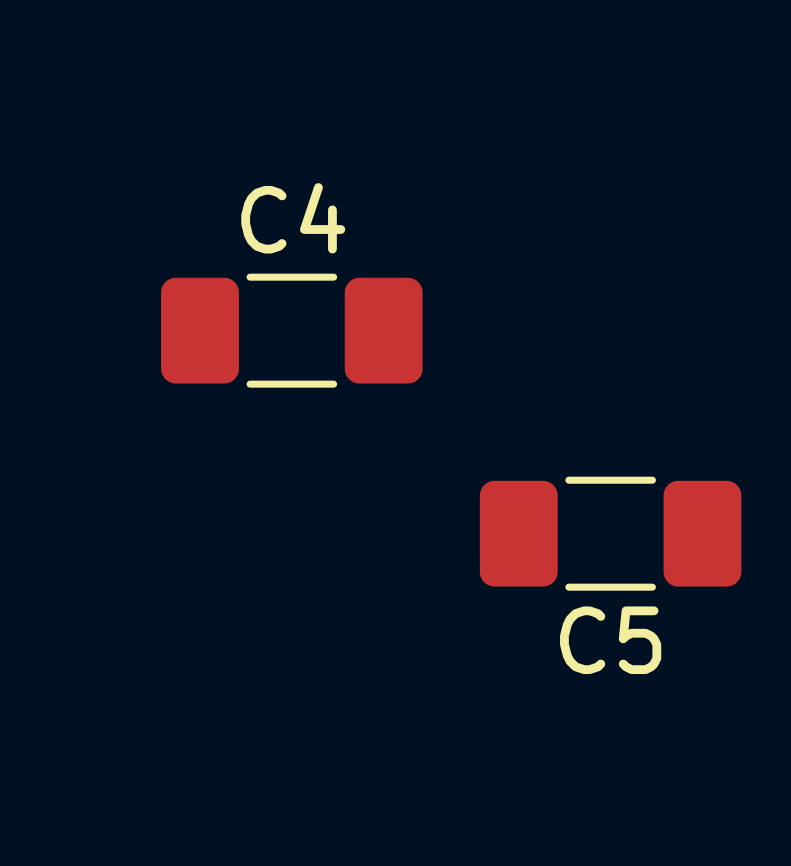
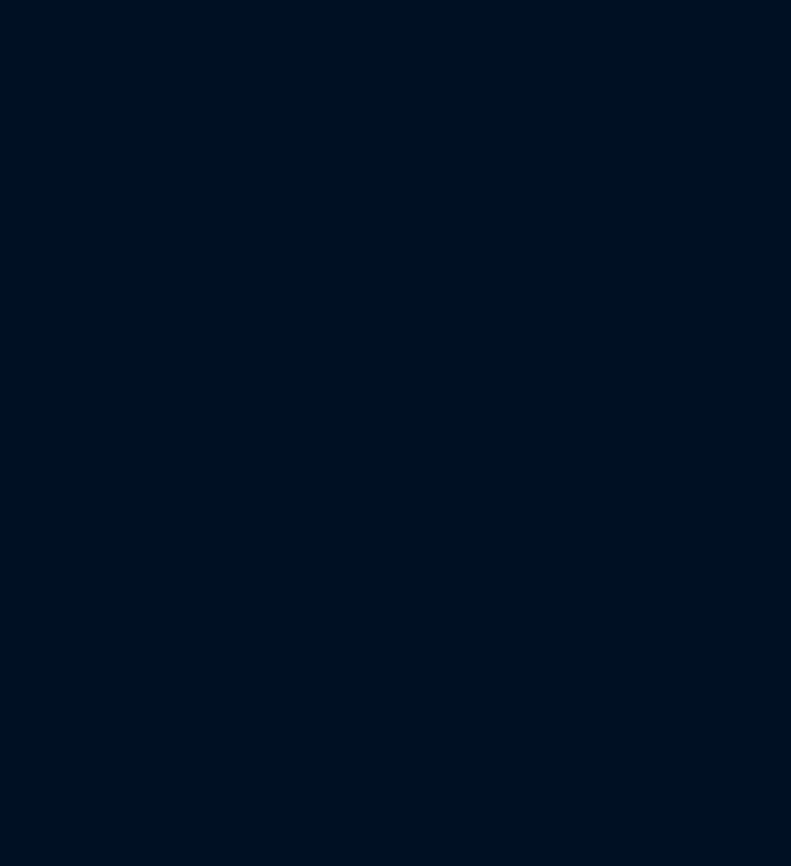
C4: (291, 330) -> none
C5: (610, 533) -> none

